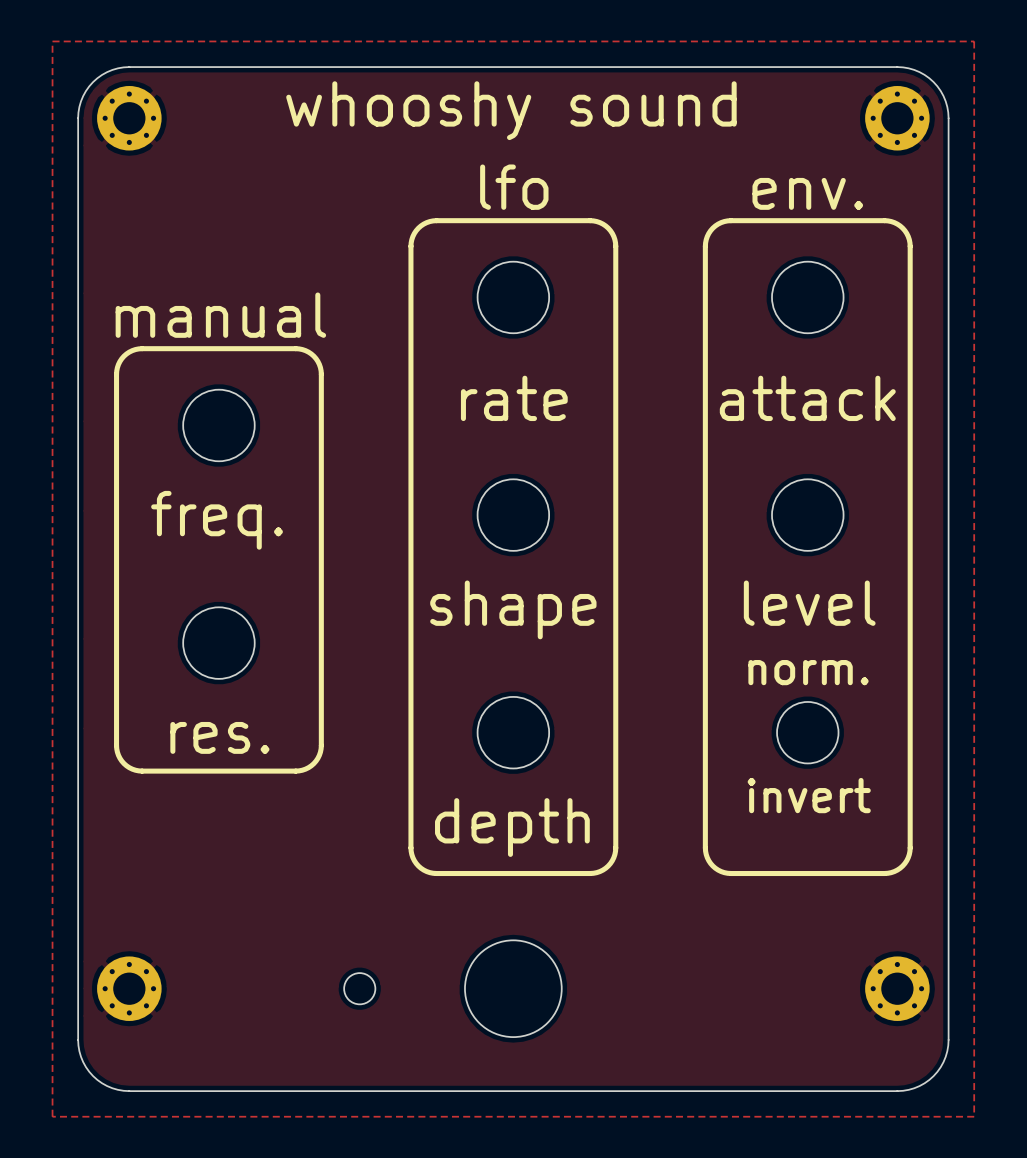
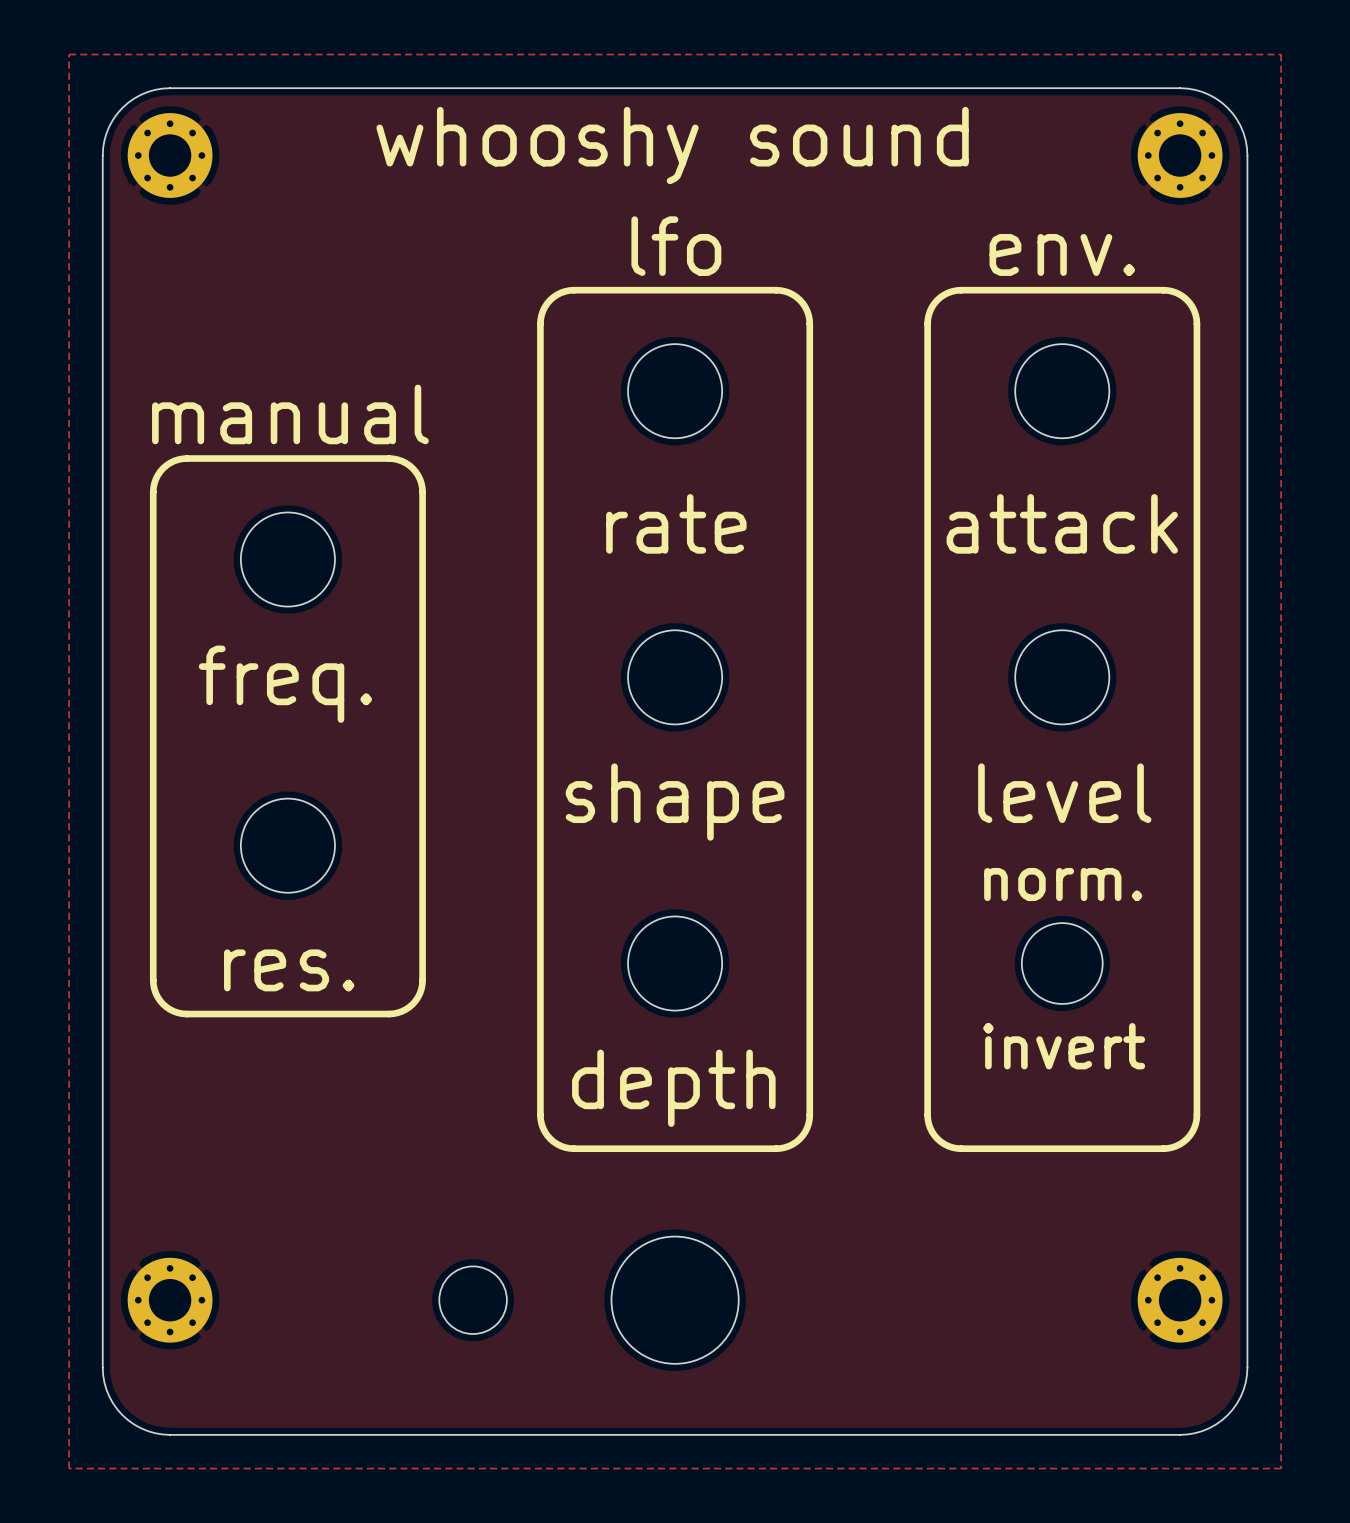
round board edge size: [343, 972, 376, 1005] -> [438, 1266, 508, 1335]

